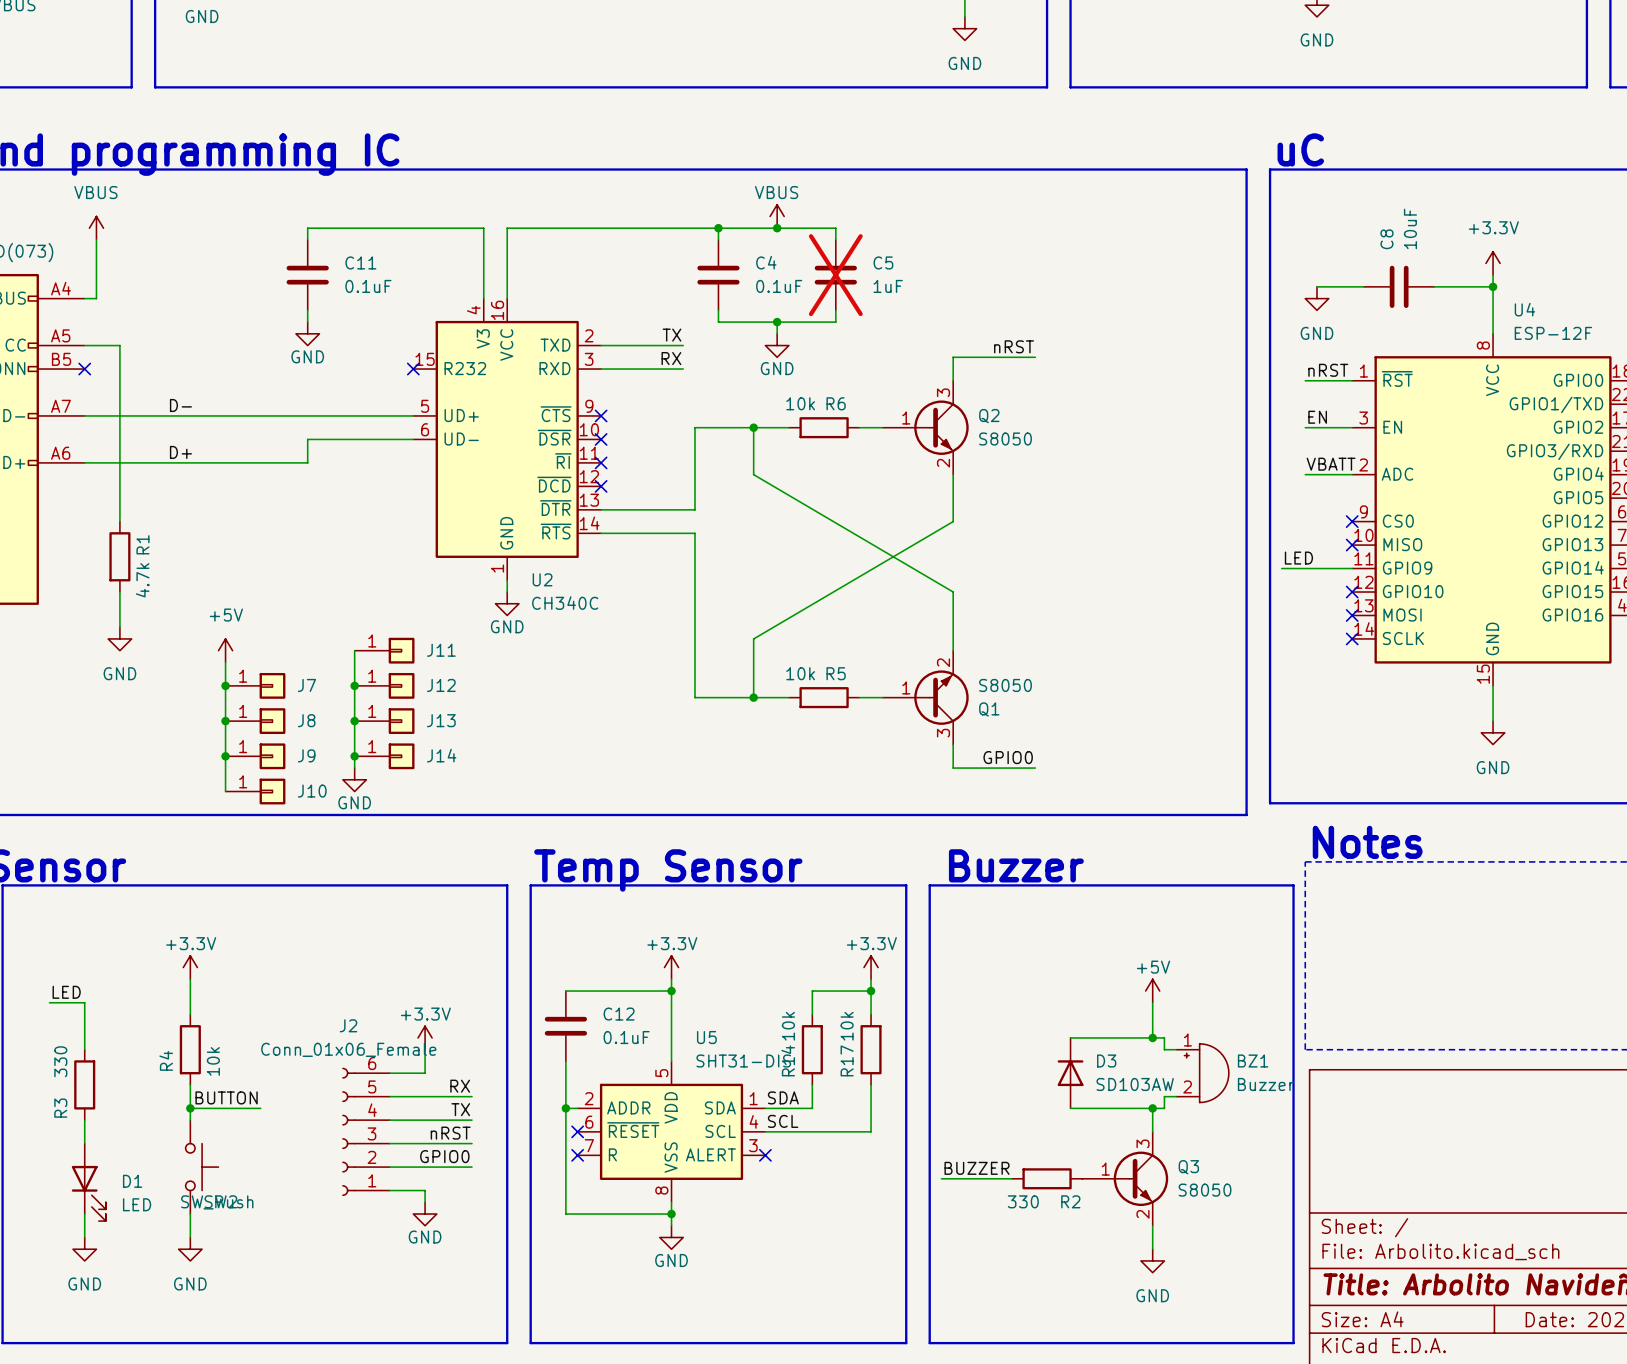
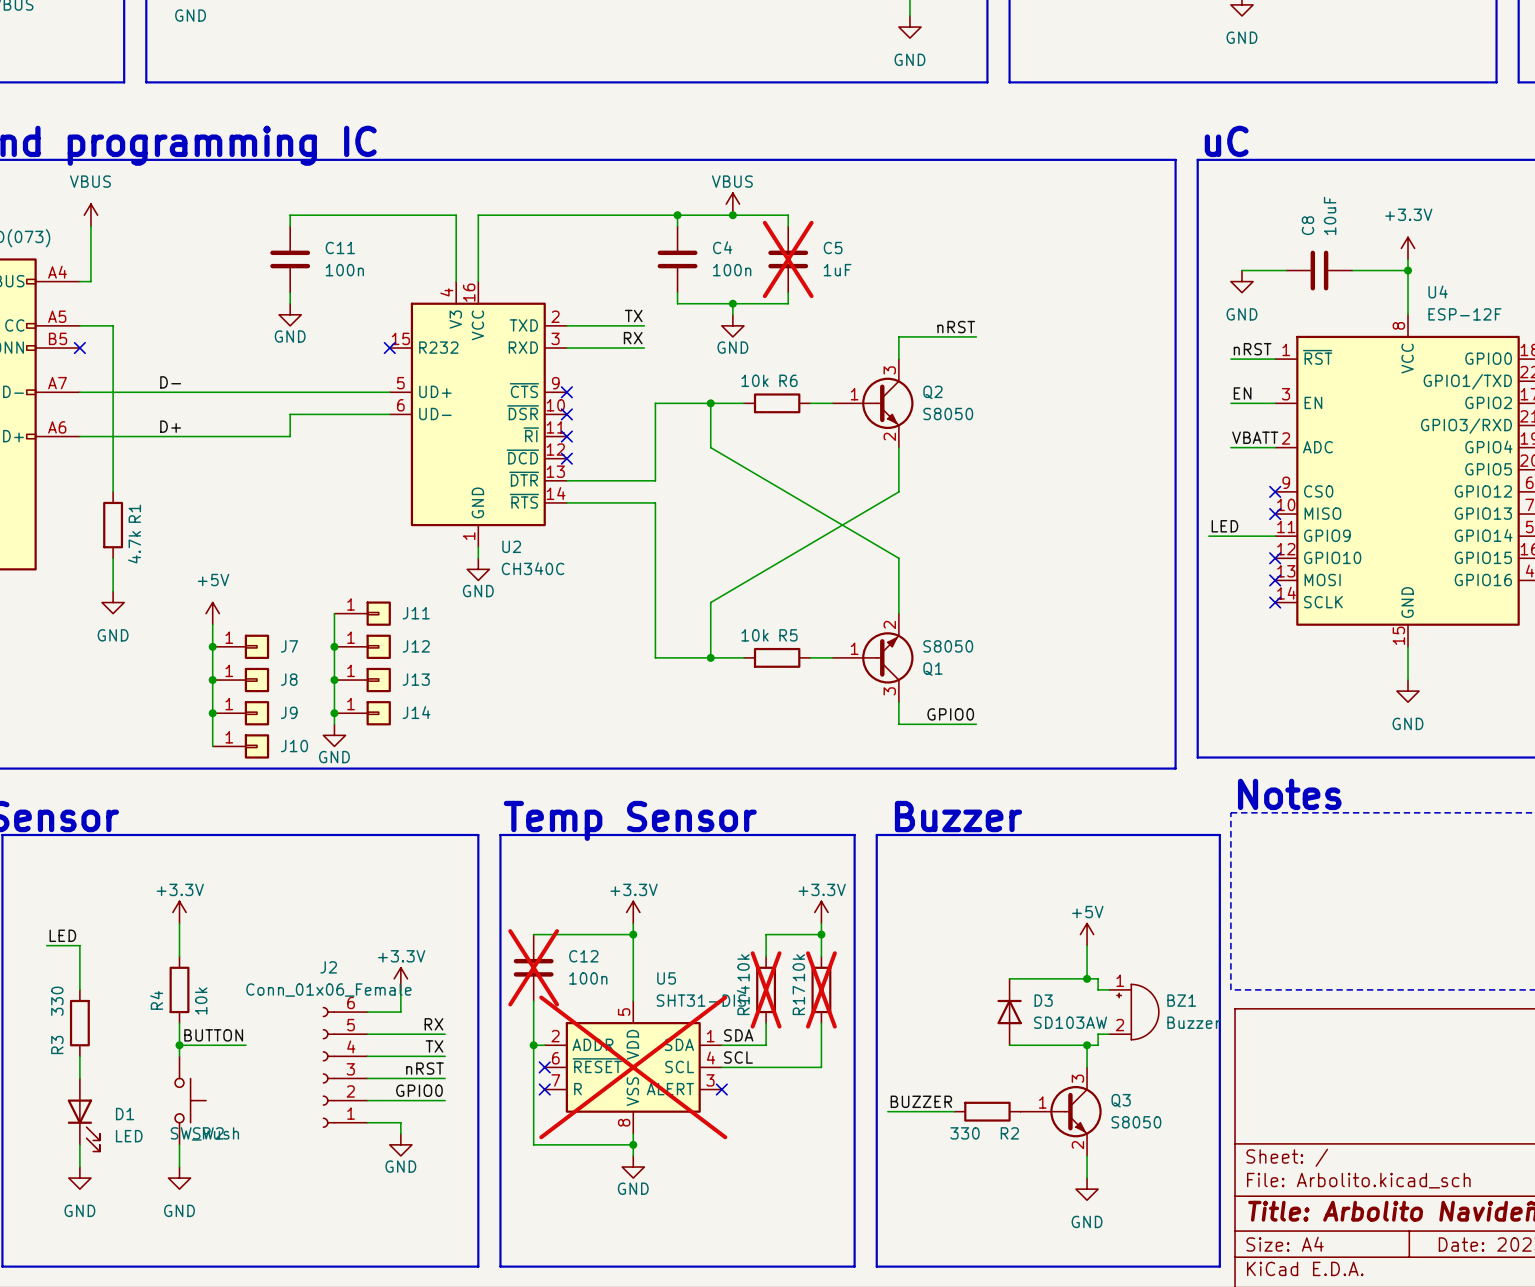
C11 value: 0.1uF (368, 286) -> 100n (344, 270)
C4 value: 0.1uF (779, 286) -> 100n (732, 270)
C12 do-not-place cross: none -> (533, 967)
C12 value: 0.1uF (626, 1037) -> 100n (588, 978)
R14 do-not-place cross: none -> (766, 989)
R17 do-not-place cross: none -> (821, 989)
U5 do-not-place cross: none -> (633, 1067)

